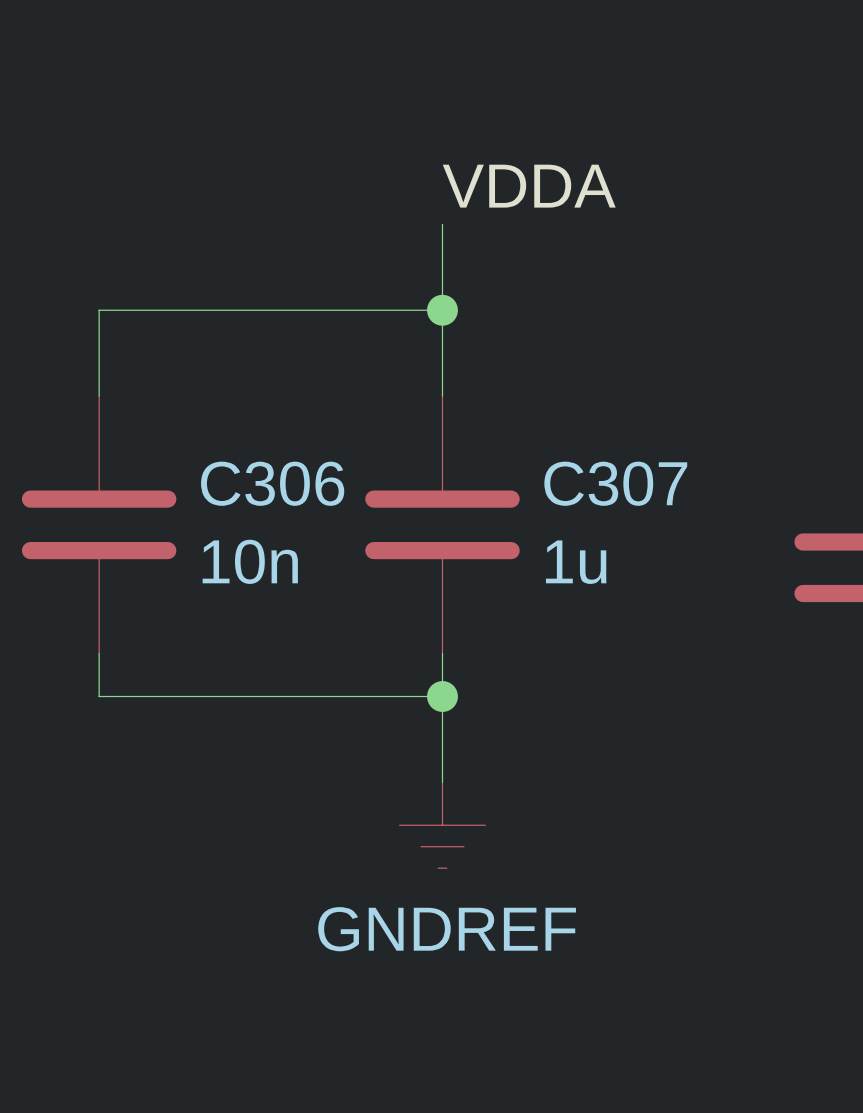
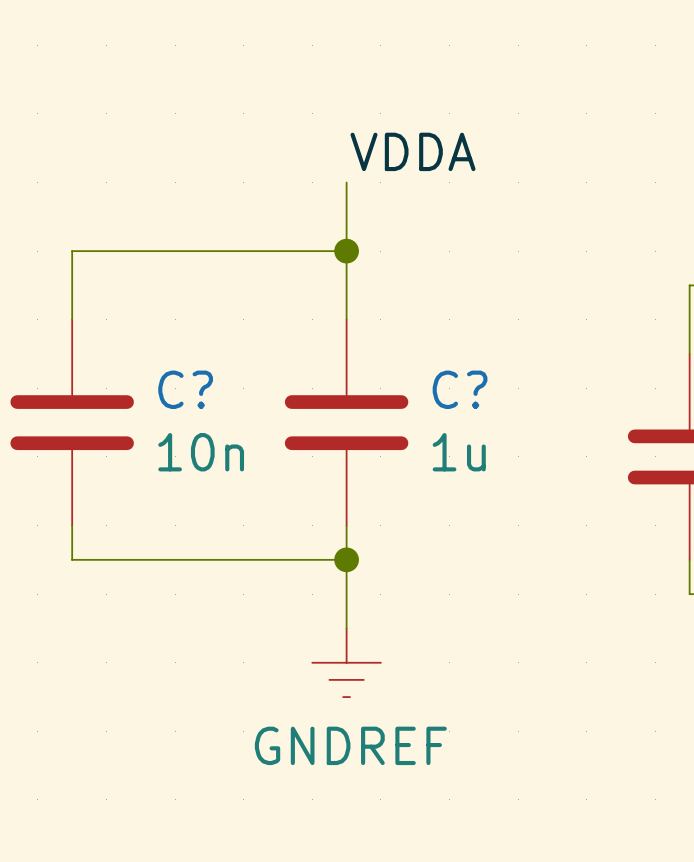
C306 name: C306 (272, 483) -> C? (185, 389)
C307 name: C307 (615, 483) -> C? (460, 389)

